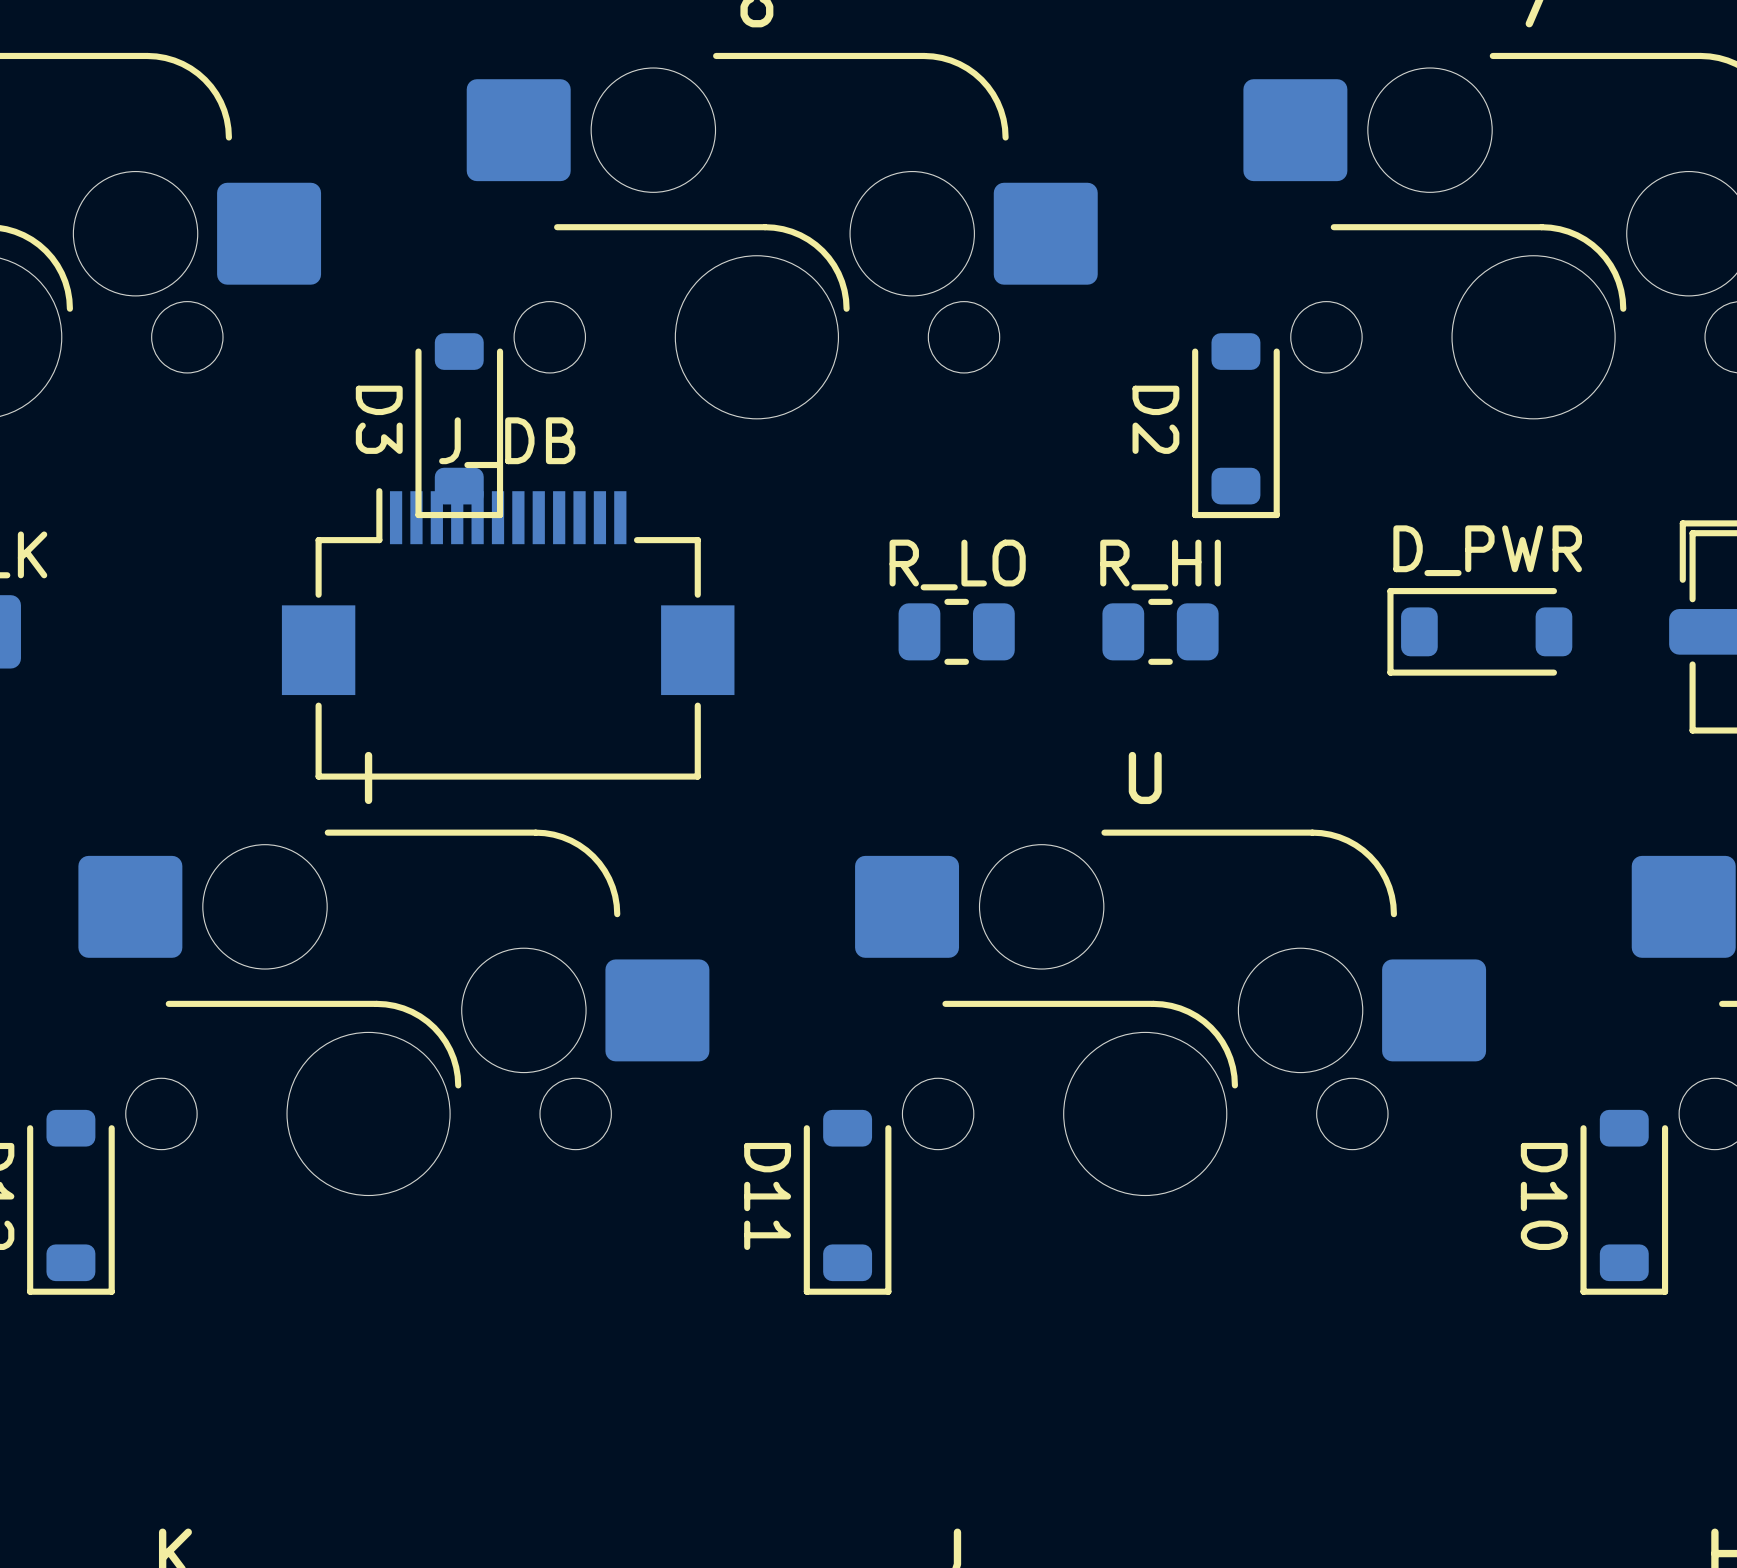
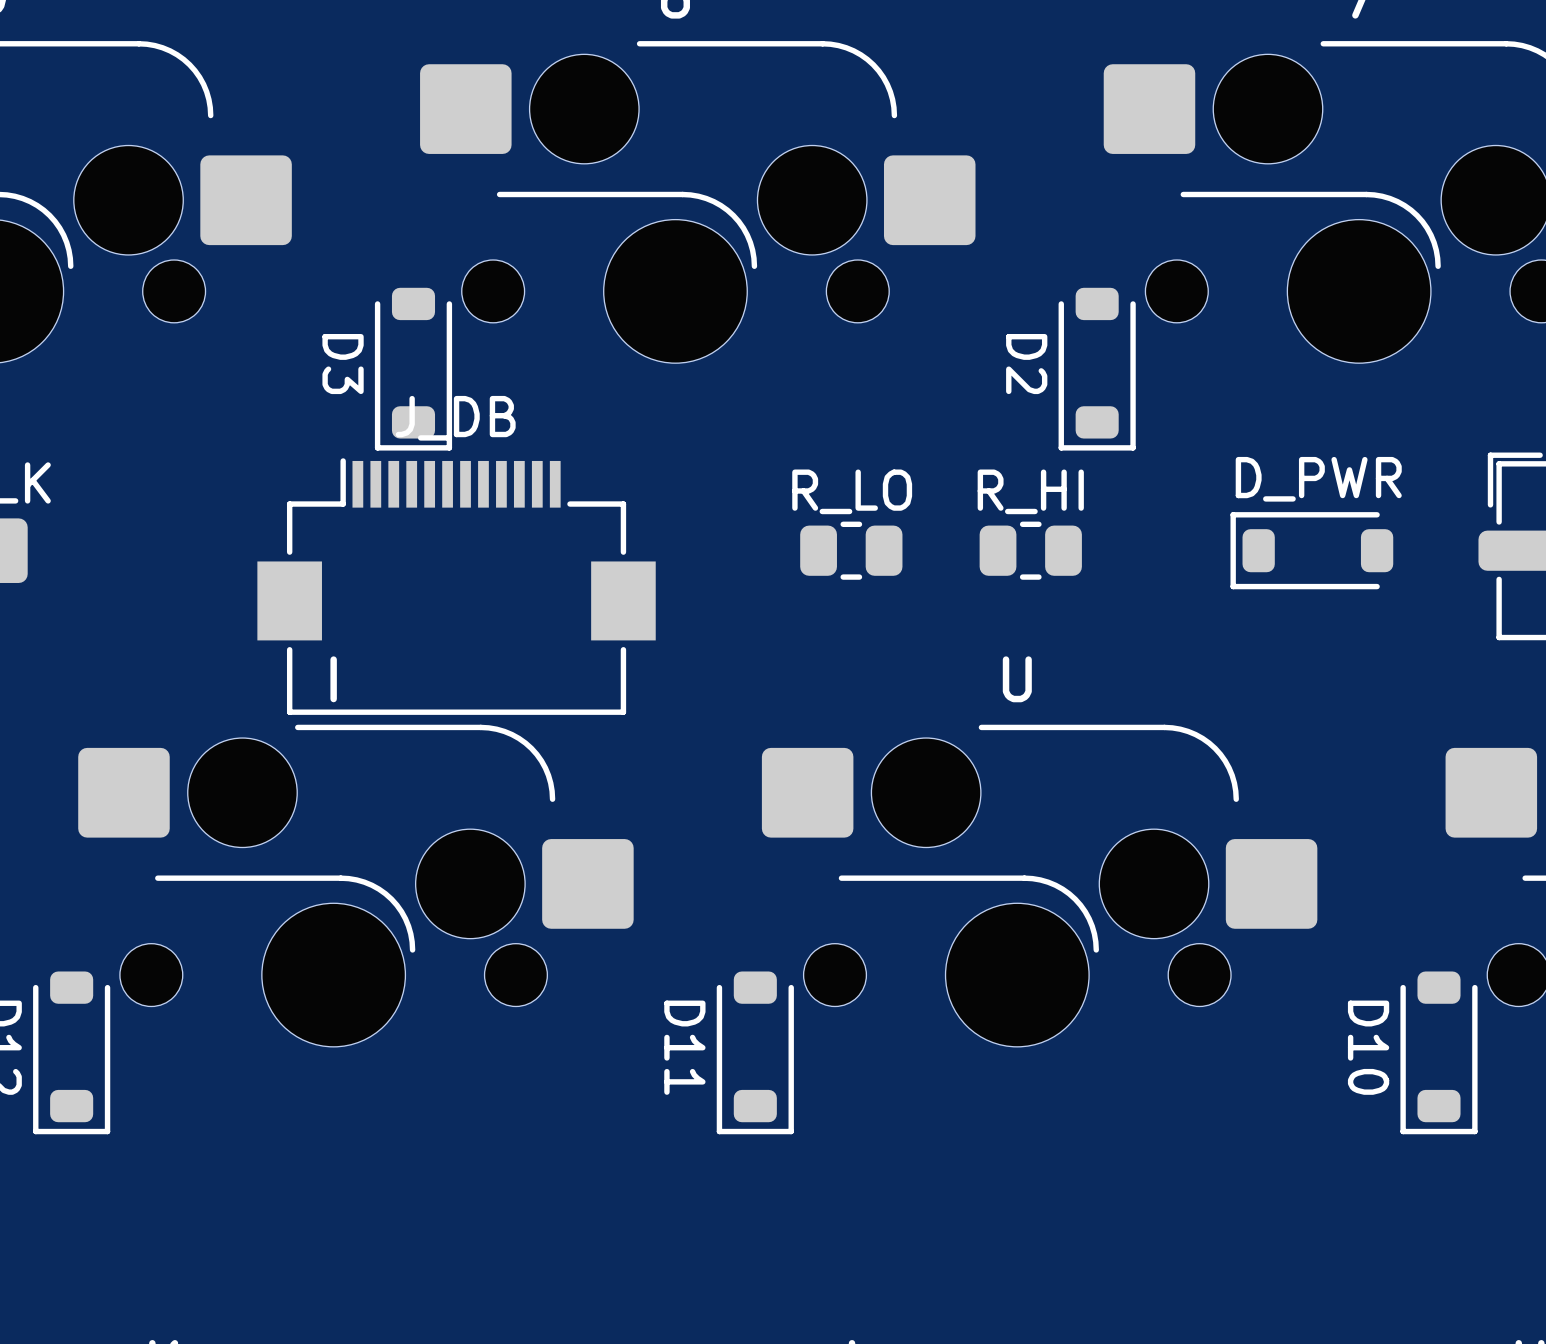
J_DB position: (508, 633) -> (456, 586)

